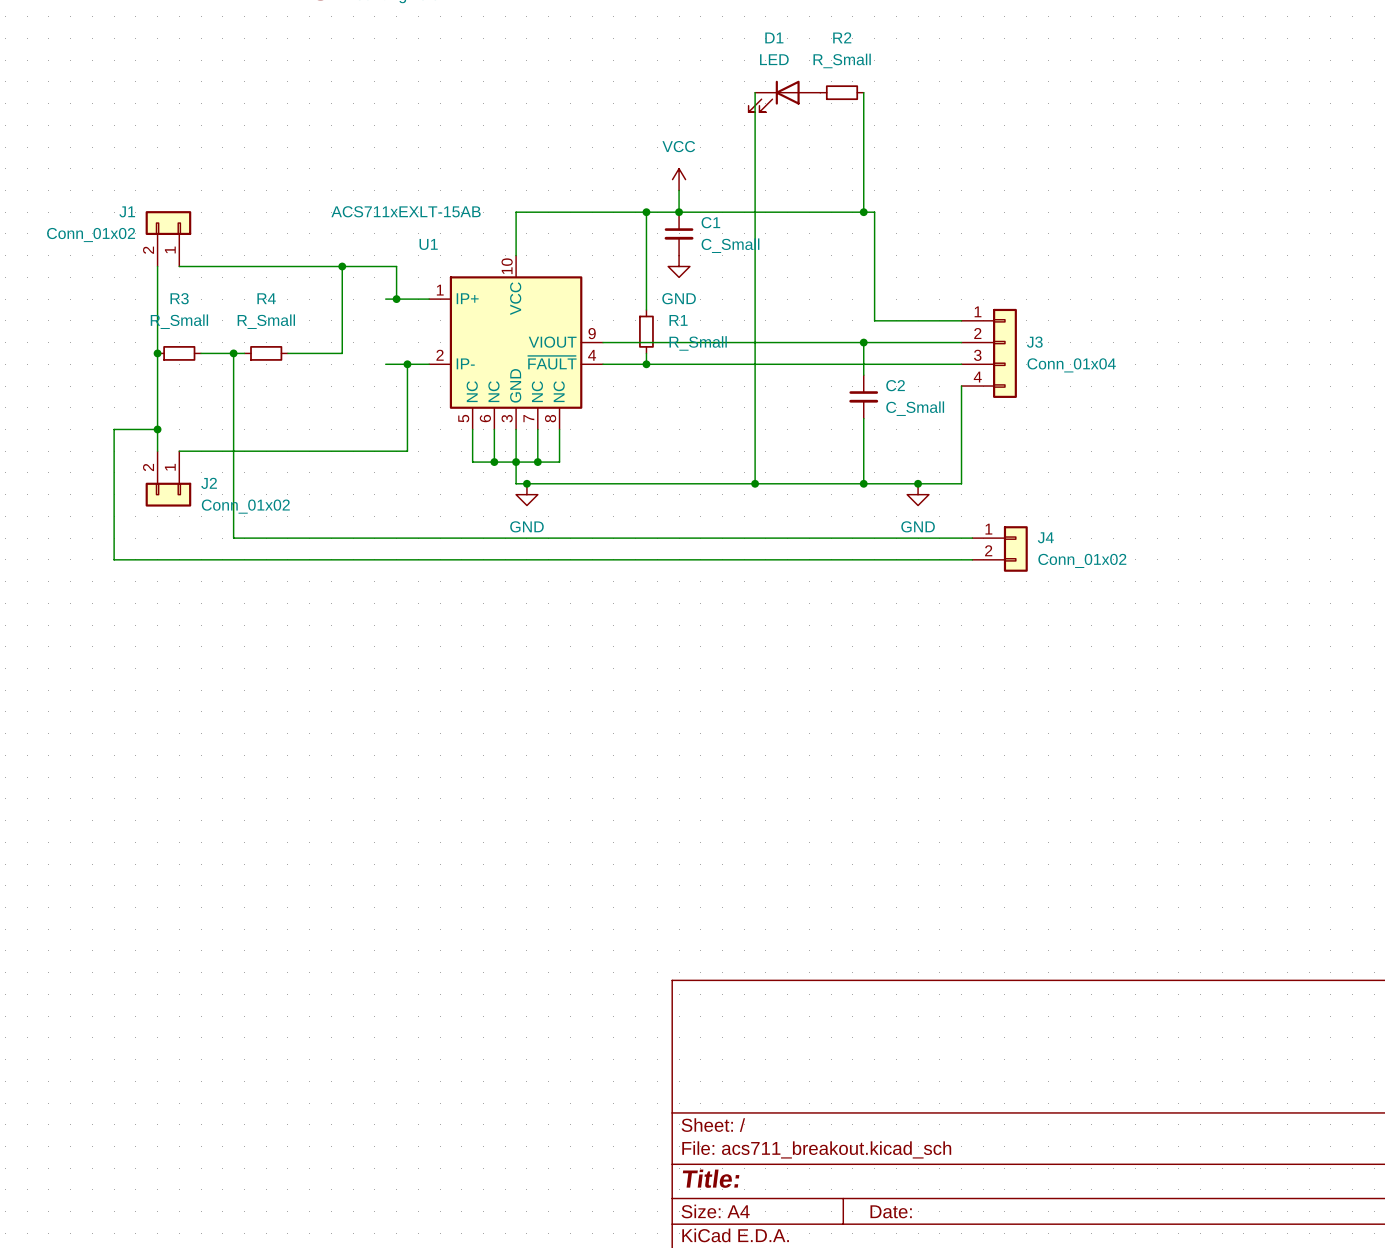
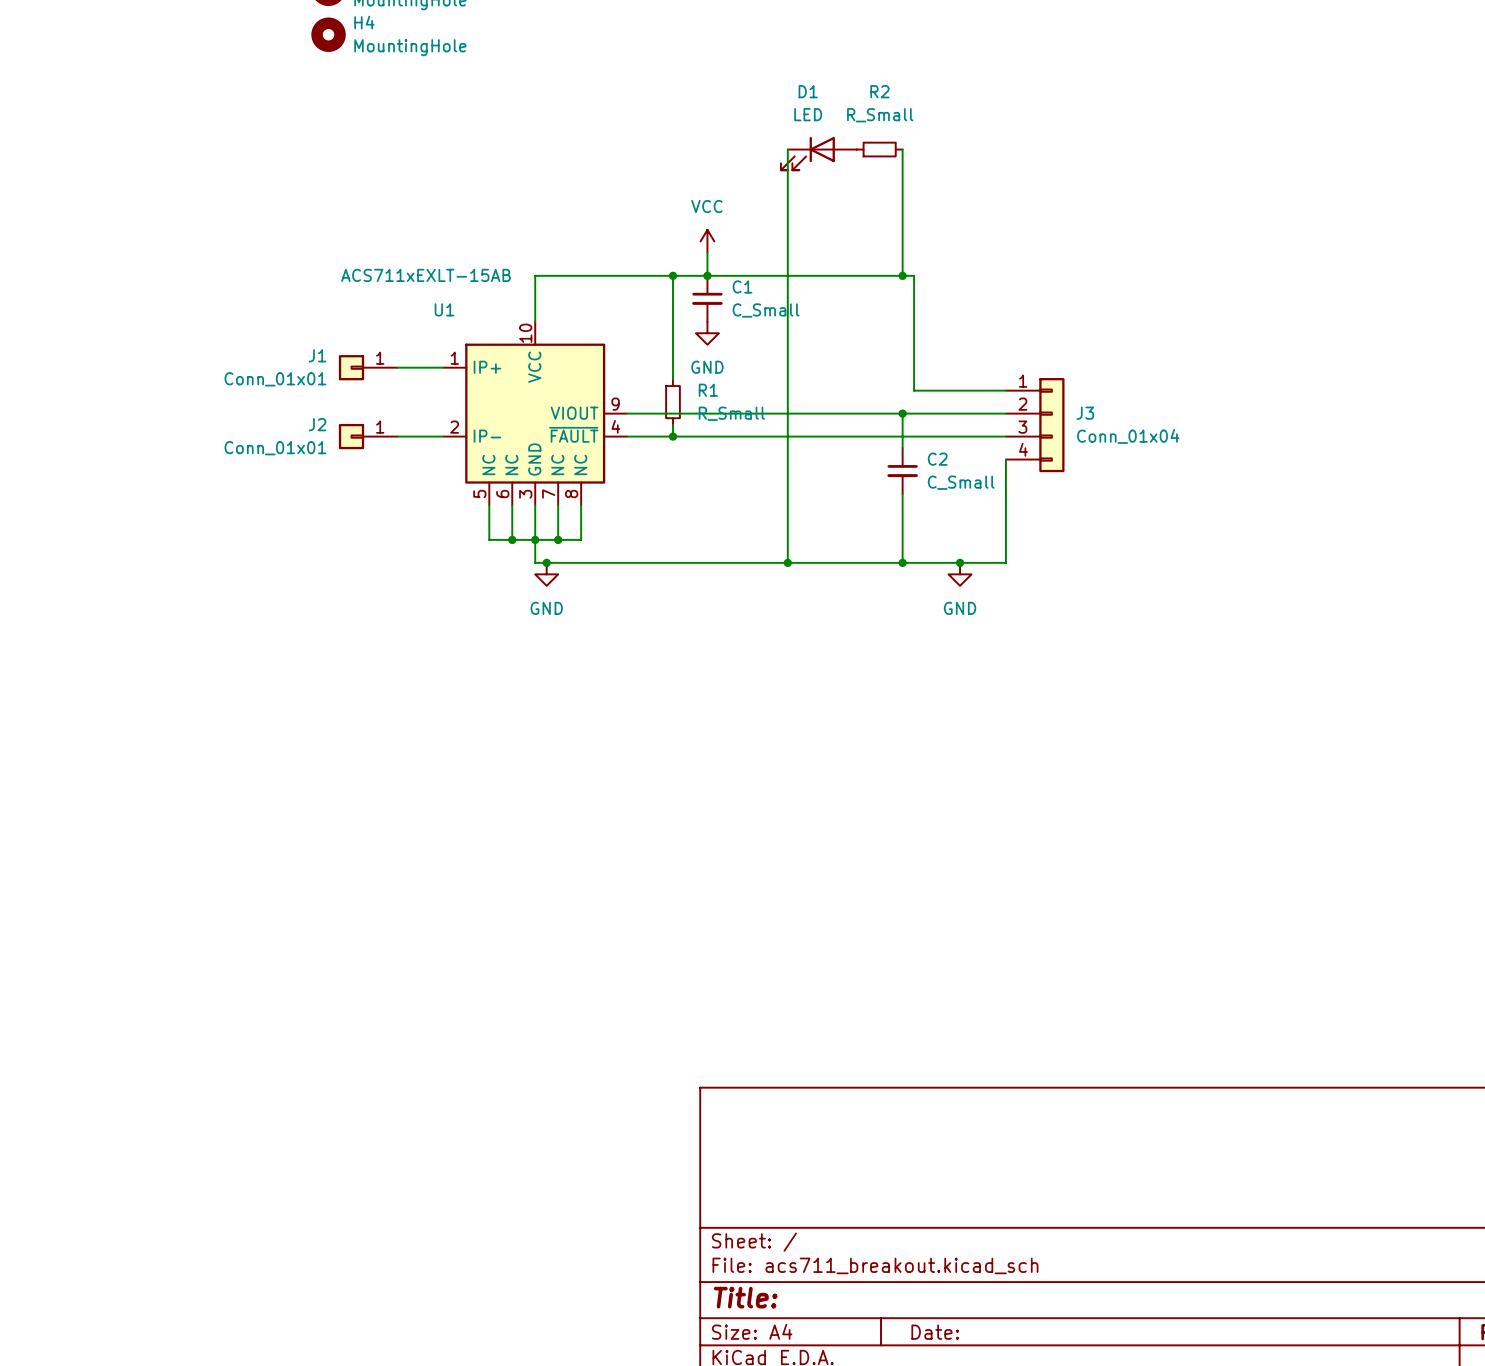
J1 symbol: [145, 211, 192, 267] -> [338, 355, 398, 381]
J1 value: Conn_01x02 (91, 234) -> Conn_01x01 (275, 379)
wire: (157, 266) (157, 451) -> none
wire: (179, 266) (396, 266) (396, 299) -> none
wire: (342, 266) (342, 353) (287, 353) -> none
junction: (342, 266) -> none
junction: (396, 299) -> none
junction: (157, 353) -> none
R3: R_Small (179, 353) -> none
wire: (201, 353) (244, 353) -> none
wire: (233, 353) (233, 538) (972, 538) -> none
junction: (233, 353) -> none
R4: R_Small (266, 353) -> none
wire: (407, 364) (407, 451) (179, 451) -> none
junction: (407, 364) -> none
wire: (157, 429) (114, 429) (114, 559) (972, 559) -> none
junction: (157, 429) -> none
J2 symbol: [145, 451, 192, 507] -> [338, 423, 398, 450]
J2 name position: J2 (209, 483) -> J2 (317, 424)
J2 value: Conn_01x02 (245, 506) -> Conn_01x01 (275, 448)
J4: Conn_01x02 (1000, 548) -> none

